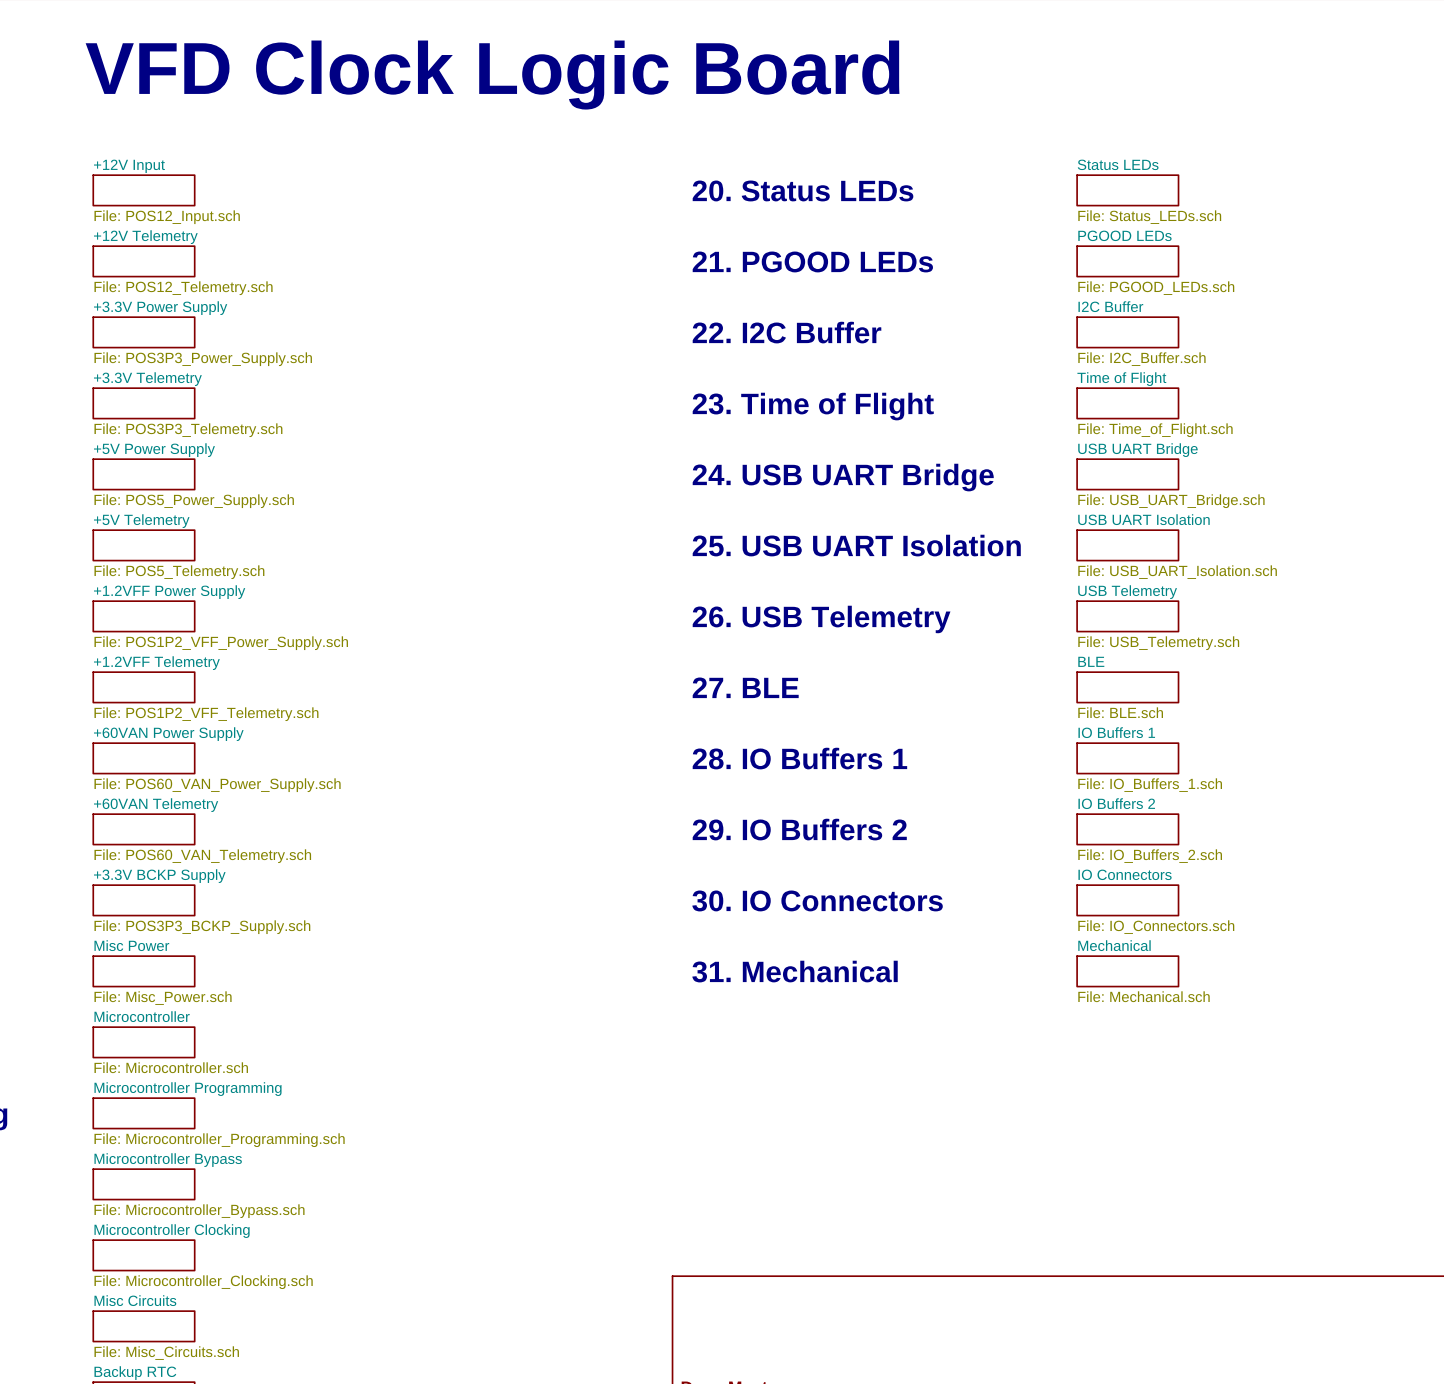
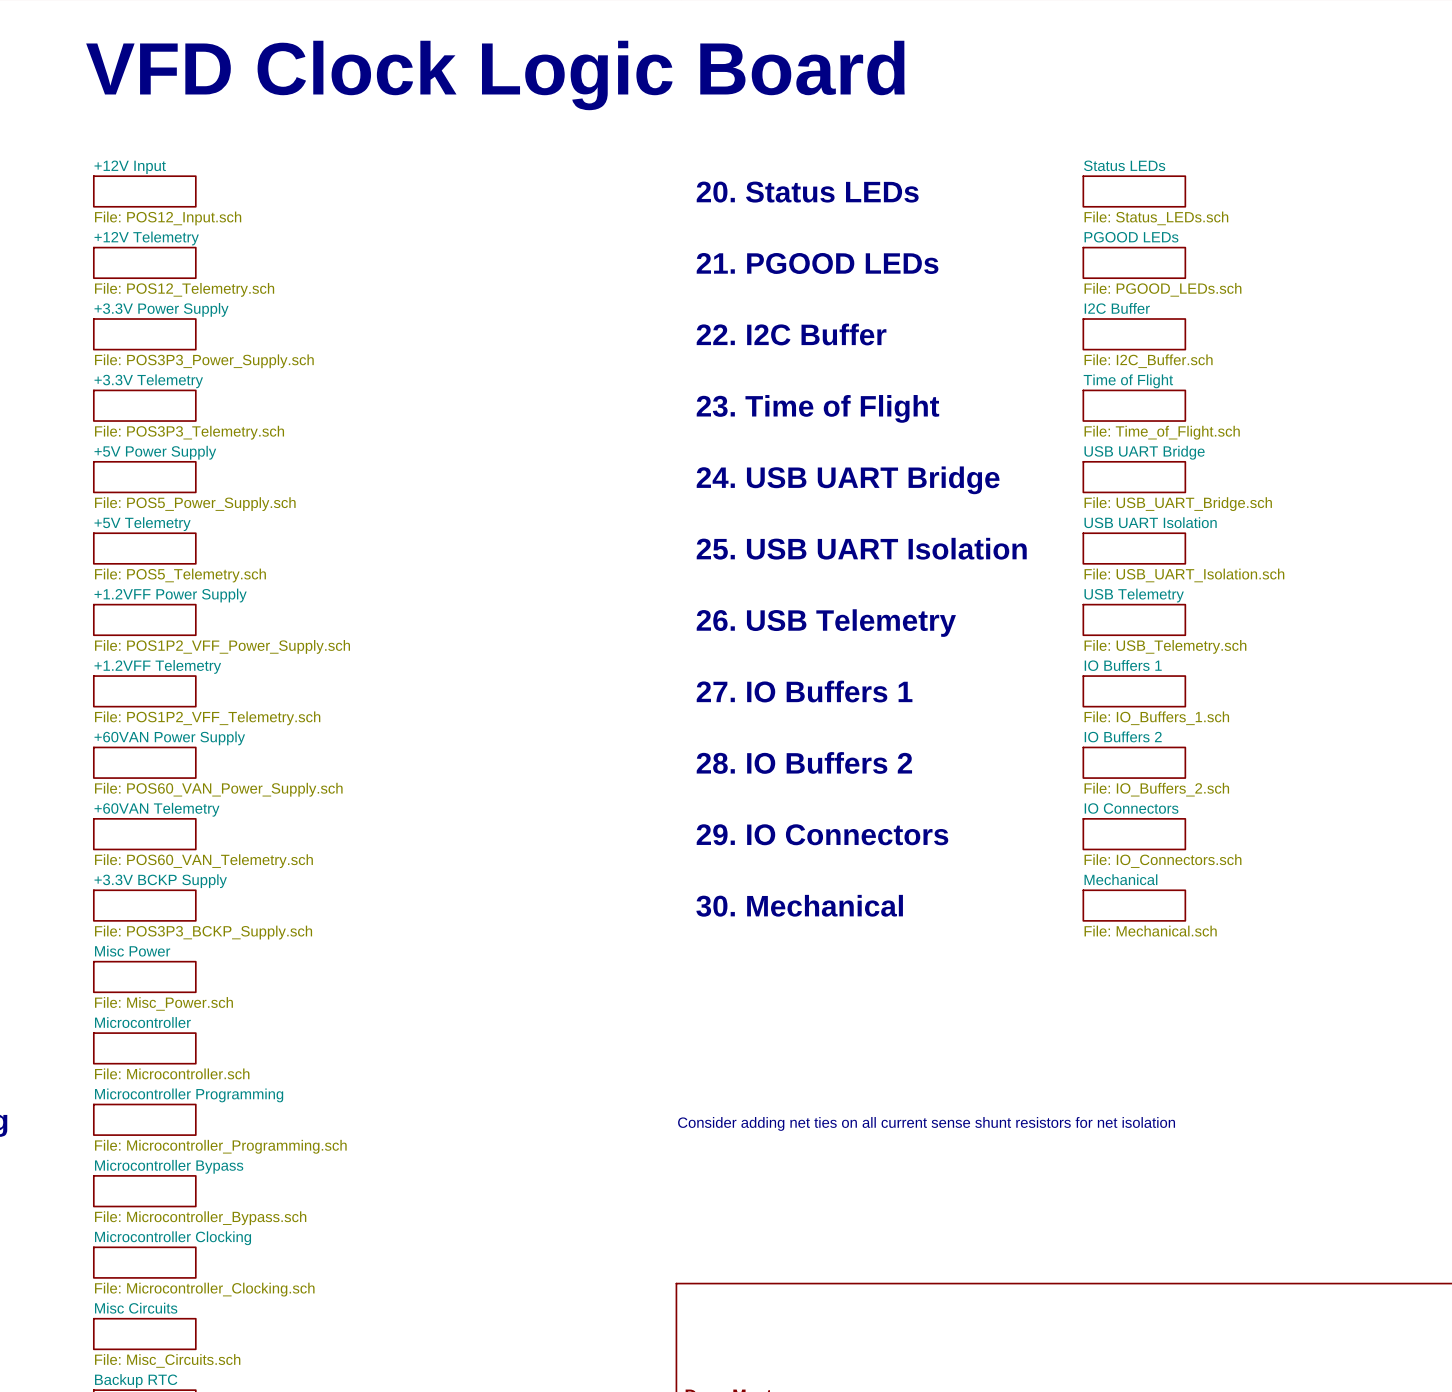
sheet BLE name: BLE (1091, 661) -> IO Buffers 1 (1123, 665)
text: 27. BLE (745, 687) -> 27. IO Buffers 1 (804, 691)
sheet BLE value: File: BLE.sch (1120, 712) -> File: IO_Buffers_1.sch (1156, 718)
sheet IO Buffers 1 name: IO Buffers 1 (1116, 732) -> IO Buffers 2 (1123, 736)
text: 28. IO Buffers 1 (799, 758) -> 28. IO Buffers 2 (804, 762)
sheet IO Buffers 1 value: File: IO_Buffers_1.sch (1150, 785) -> File: IO_Buffers_2.sch (1156, 789)
sheet IO Buffers 2 name: IO Buffers 2 (1116, 803) -> IO Connectors (1131, 808)
text: 29. IO Buffers 2 (799, 829) -> 29. IO Connectors (822, 834)
sheet IO Buffers 2 value: File: IO_Buffers_2.sch (1150, 856) -> File: IO_Connectors.sch (1162, 861)
sheet IO Connectors name: IO Connectors (1125, 874) -> Mechanical (1120, 879)
text: 30. IO Connectors (817, 900) -> 30. Mechanical (799, 905)
sheet IO Connectors value: File: IO_Connectors.sch (1156, 927) -> File: Mechanical.sch (1150, 931)
text: 31. Mechanical (795, 971) -> none
sheet Mechanical: File: Mechanical.sch (1127, 971) -> none
text: none -> Consider adding net ties on all current sense shunt resistors for net isolation (926, 1123)

